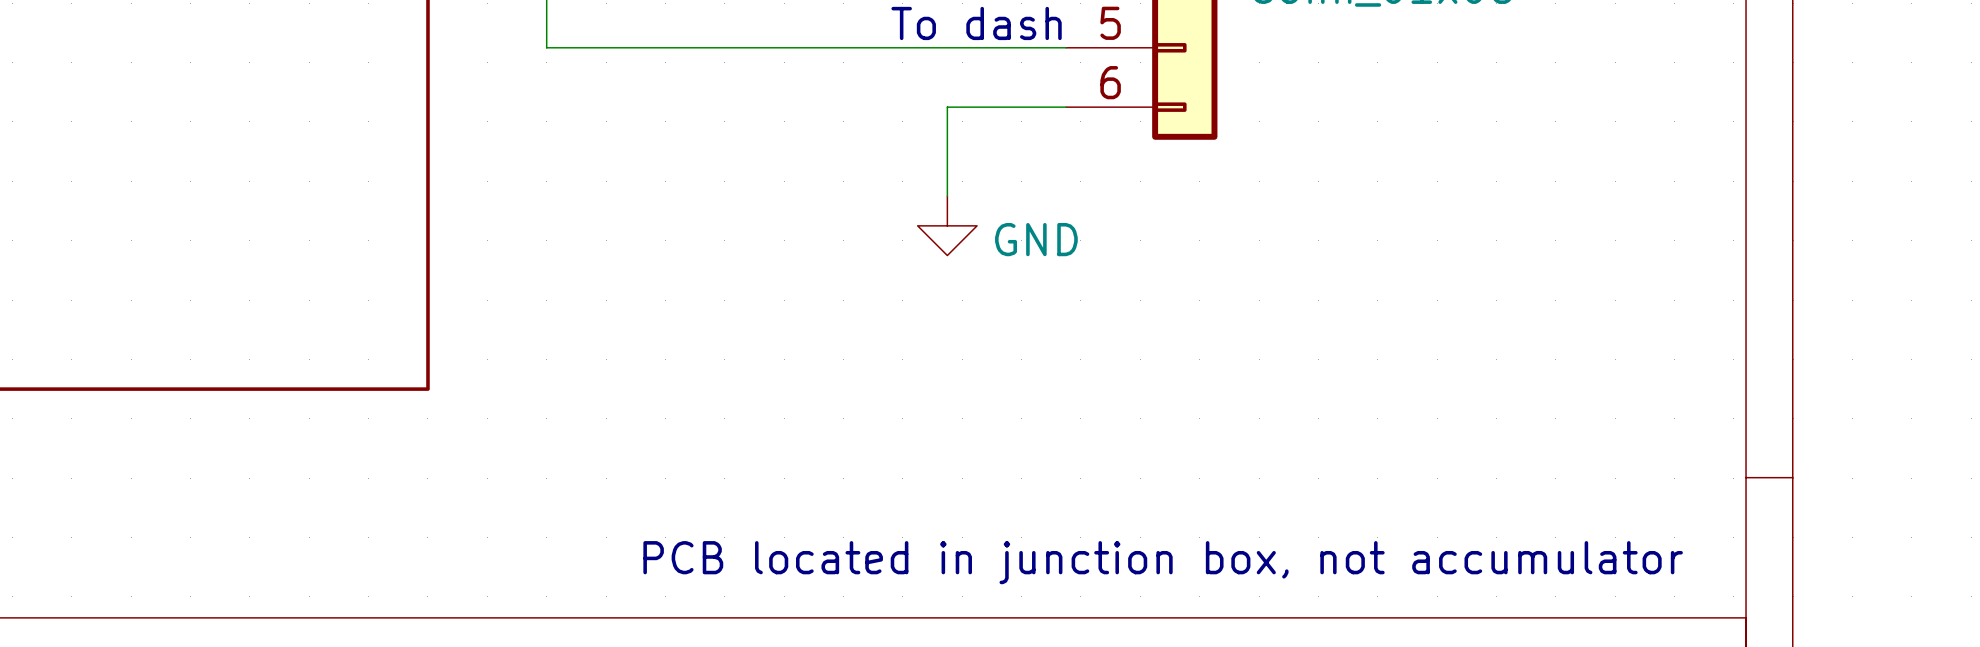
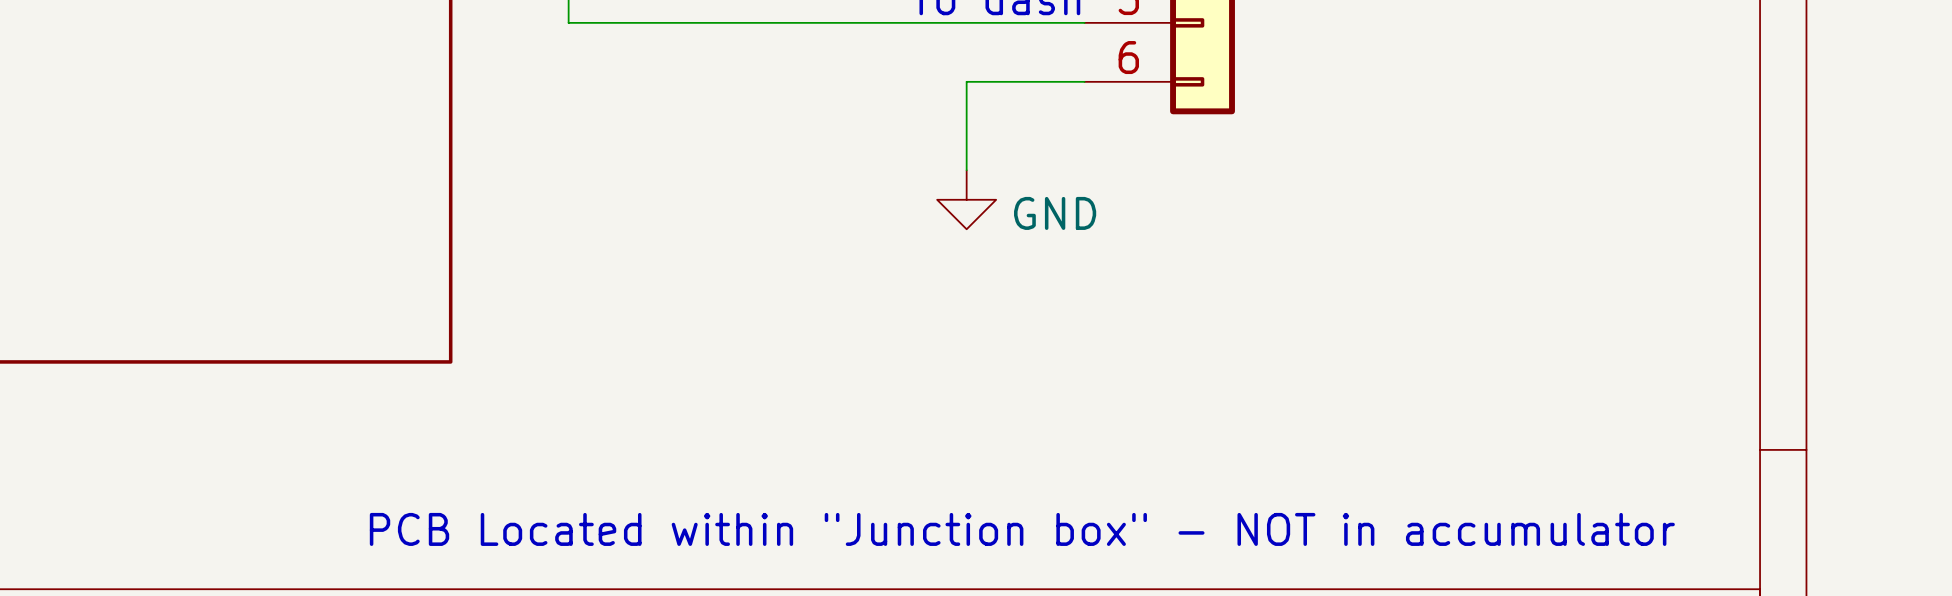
text: PCB located in junction box, not accumulator (1163, 562) -> PCB Located within "Junction box" - NOT in accumulator (1022, 529)

